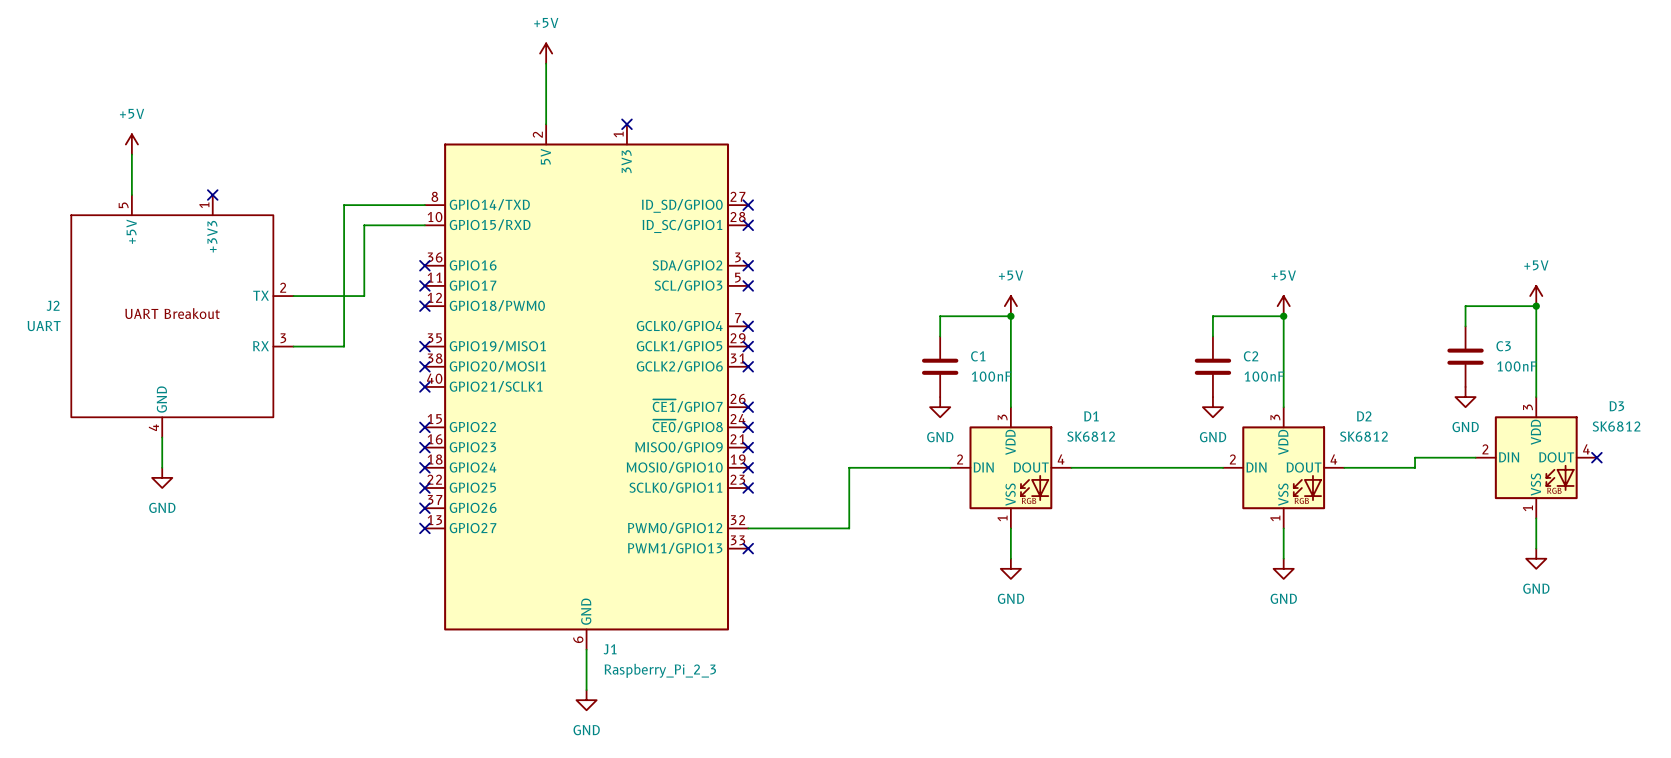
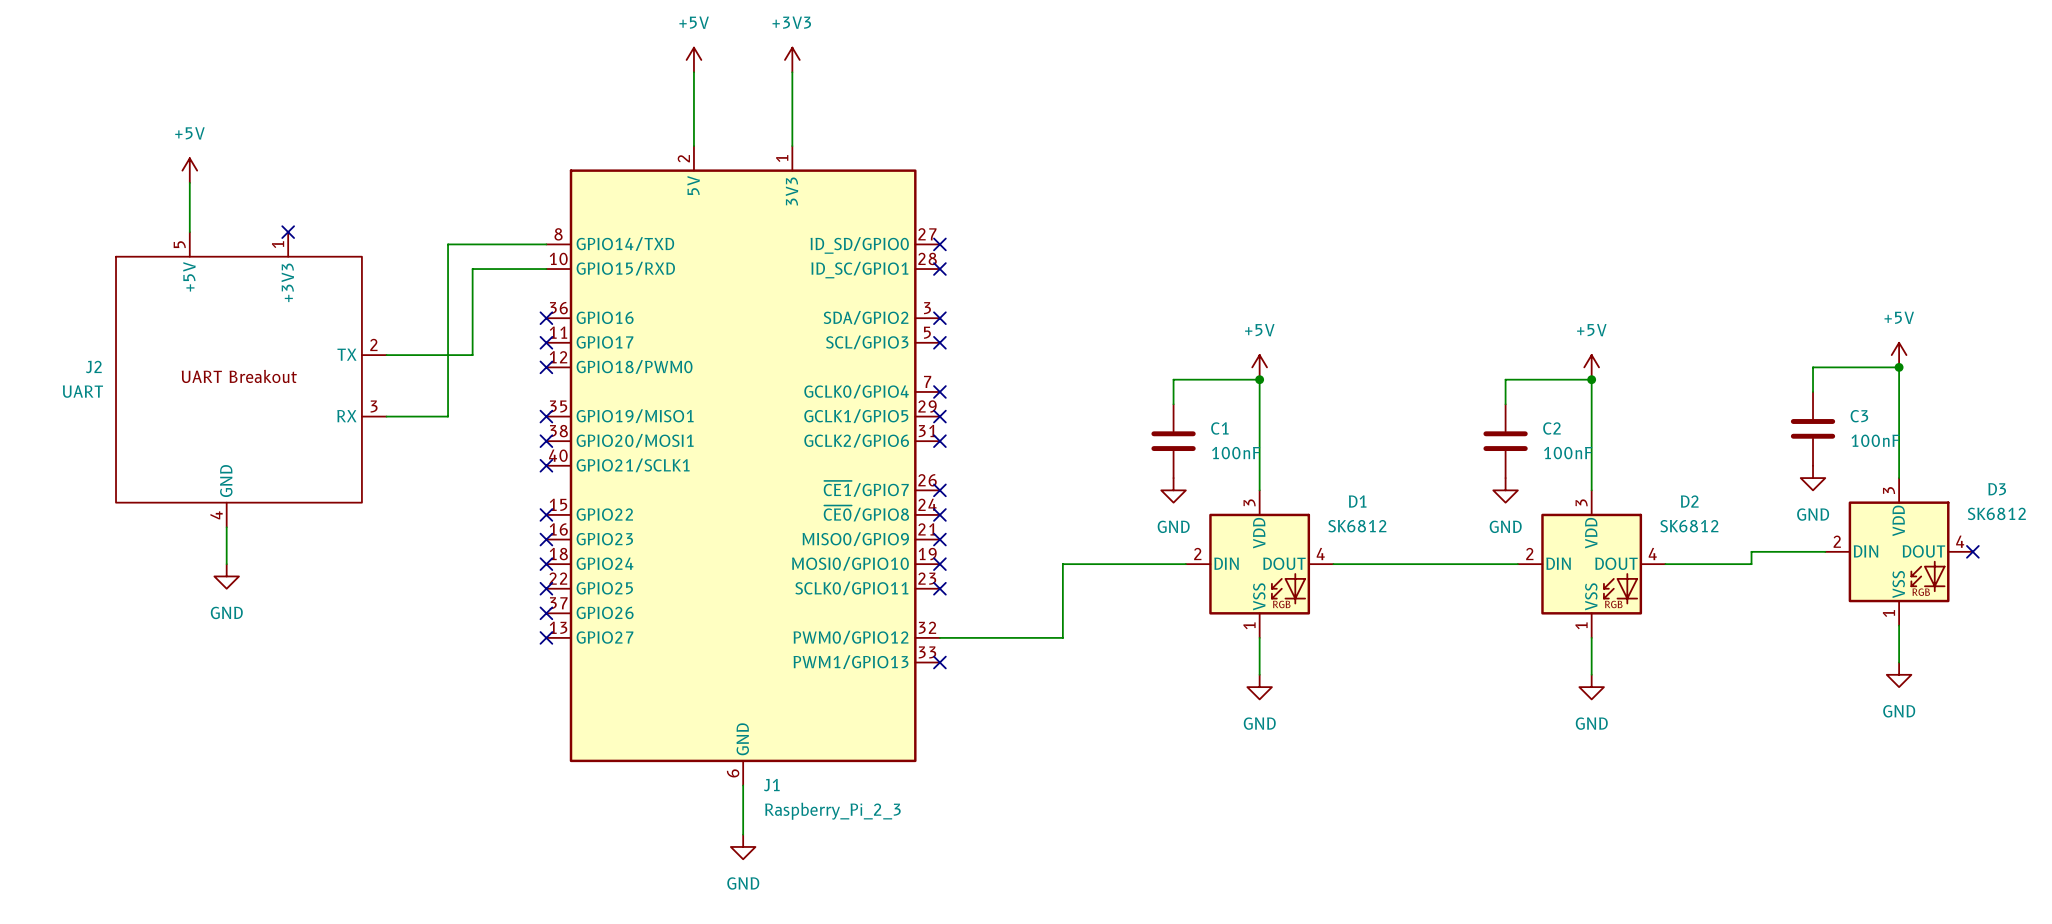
power symbol: none -> +3V3 (792, 59)
wire: none -> (792, 72) (792, 146)
no-connect mark: (626, 124) -> none

